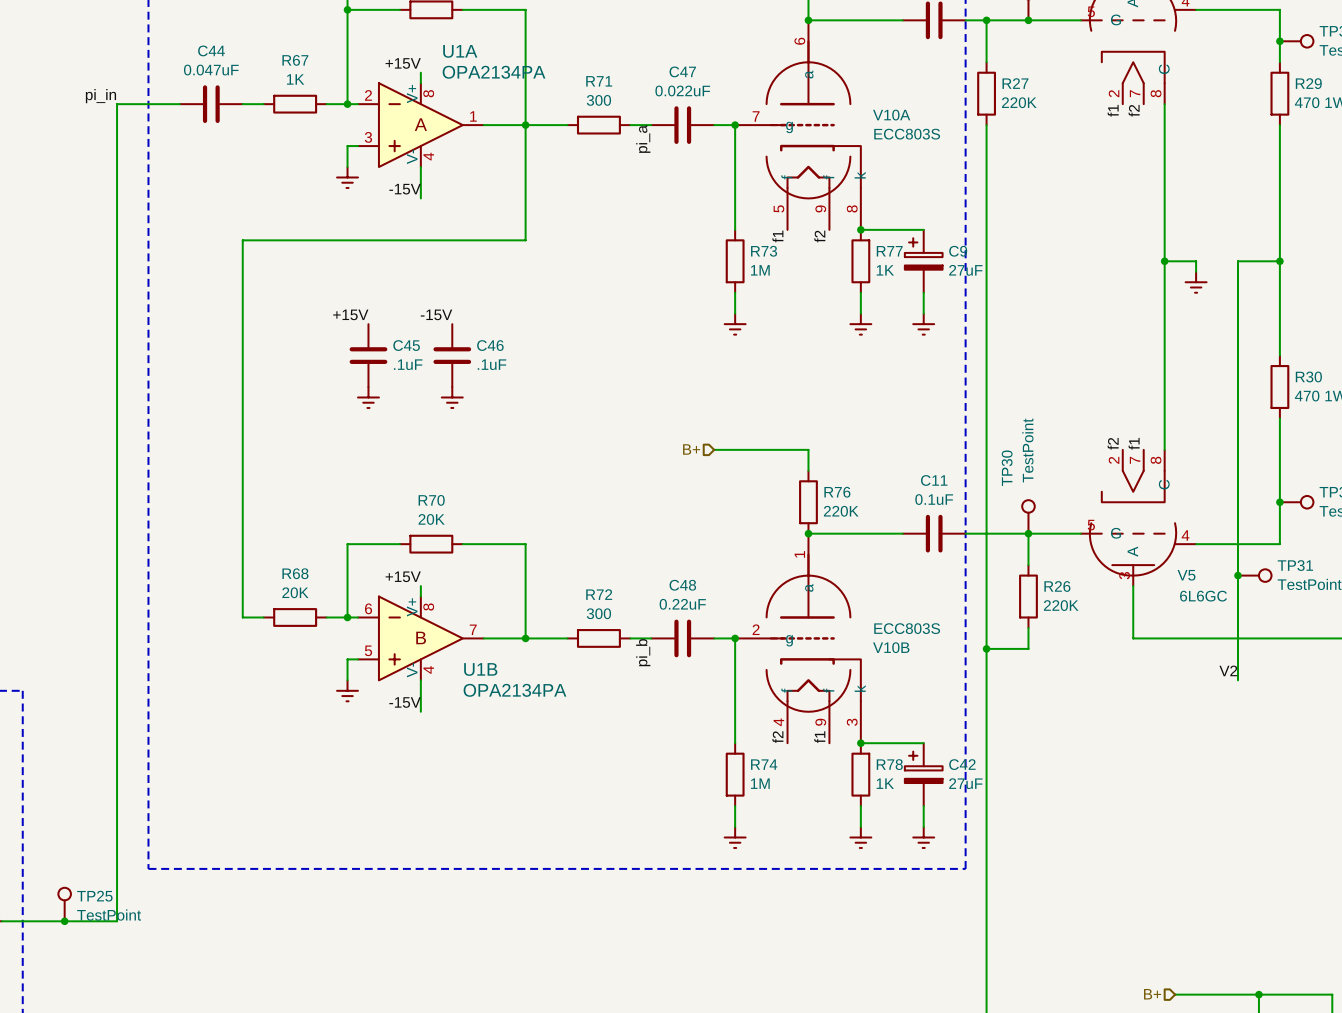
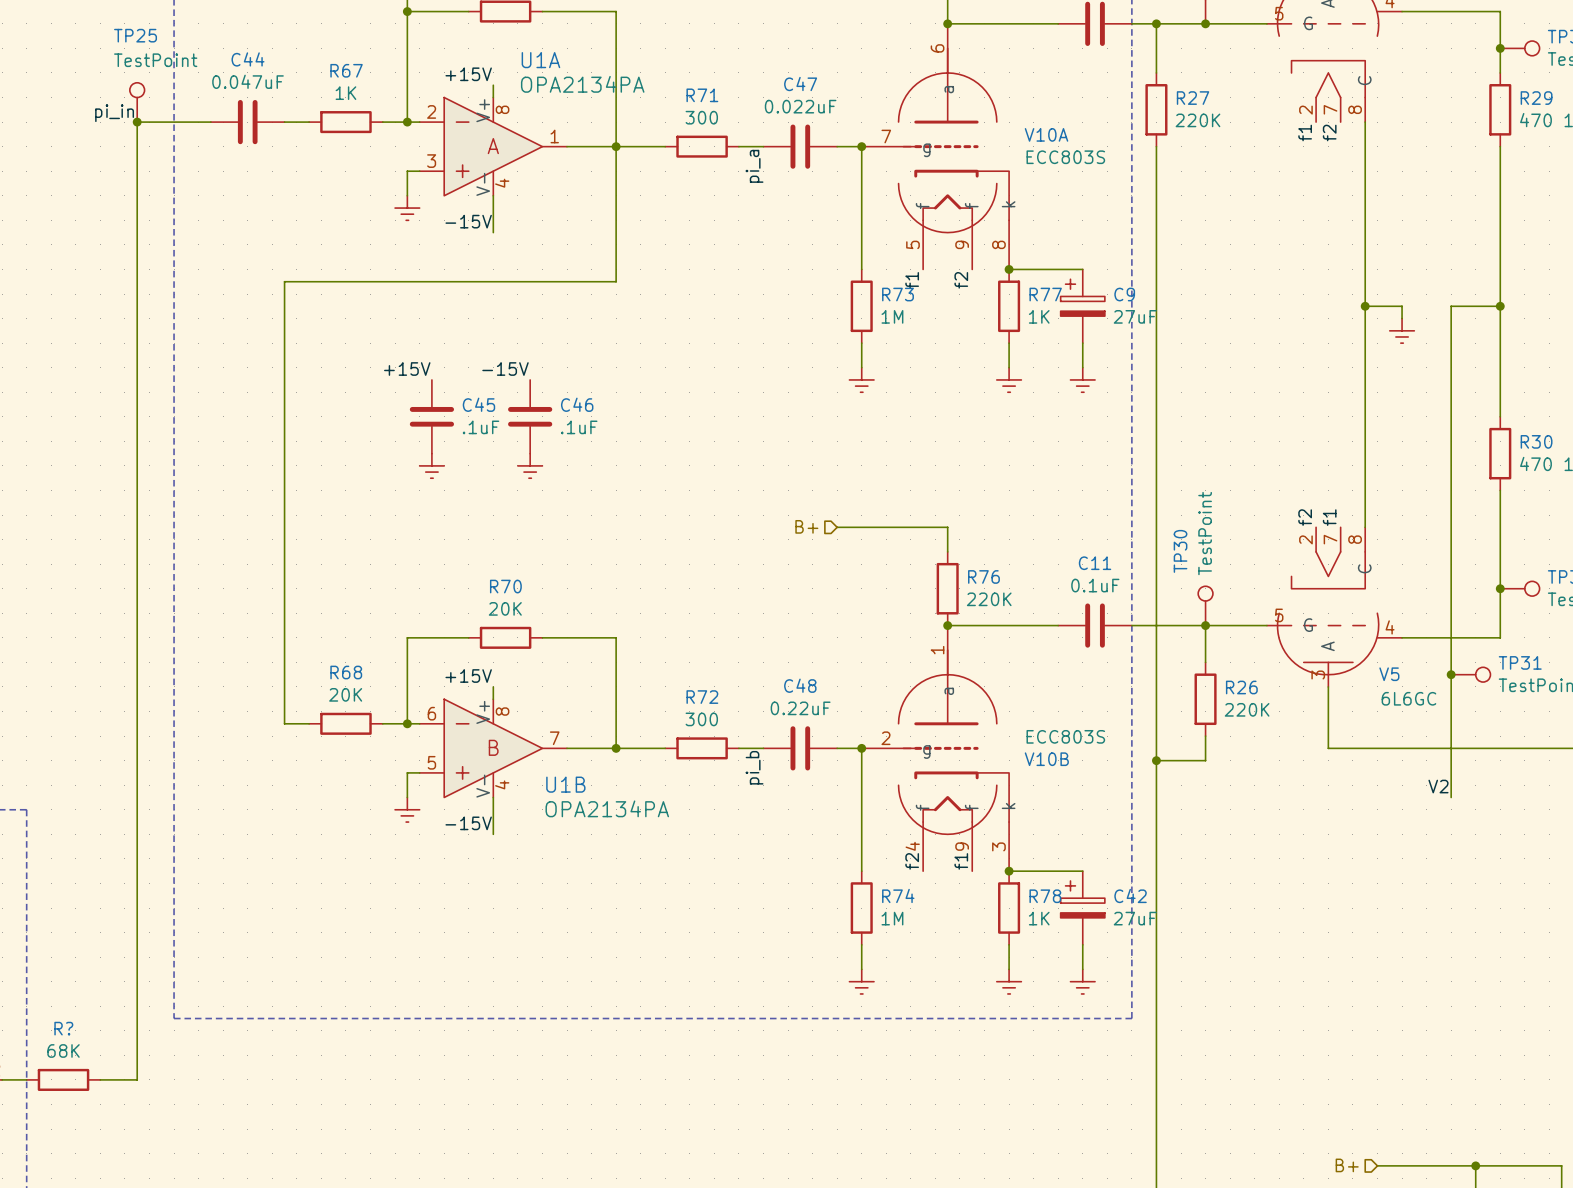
junction: none -> (137, 122)
TP25 name position: TP25 (94, 896) -> TP25 (135, 35)
TP25 position: (64, 904) -> (137, 102)
TP25 value position: TestPoint (109, 915) -> TestPoint (155, 60)
wire: (22, 921) (85, 921) -> none
R?: none -> 68K (63, 1079)
junction: (64, 921) -> none

